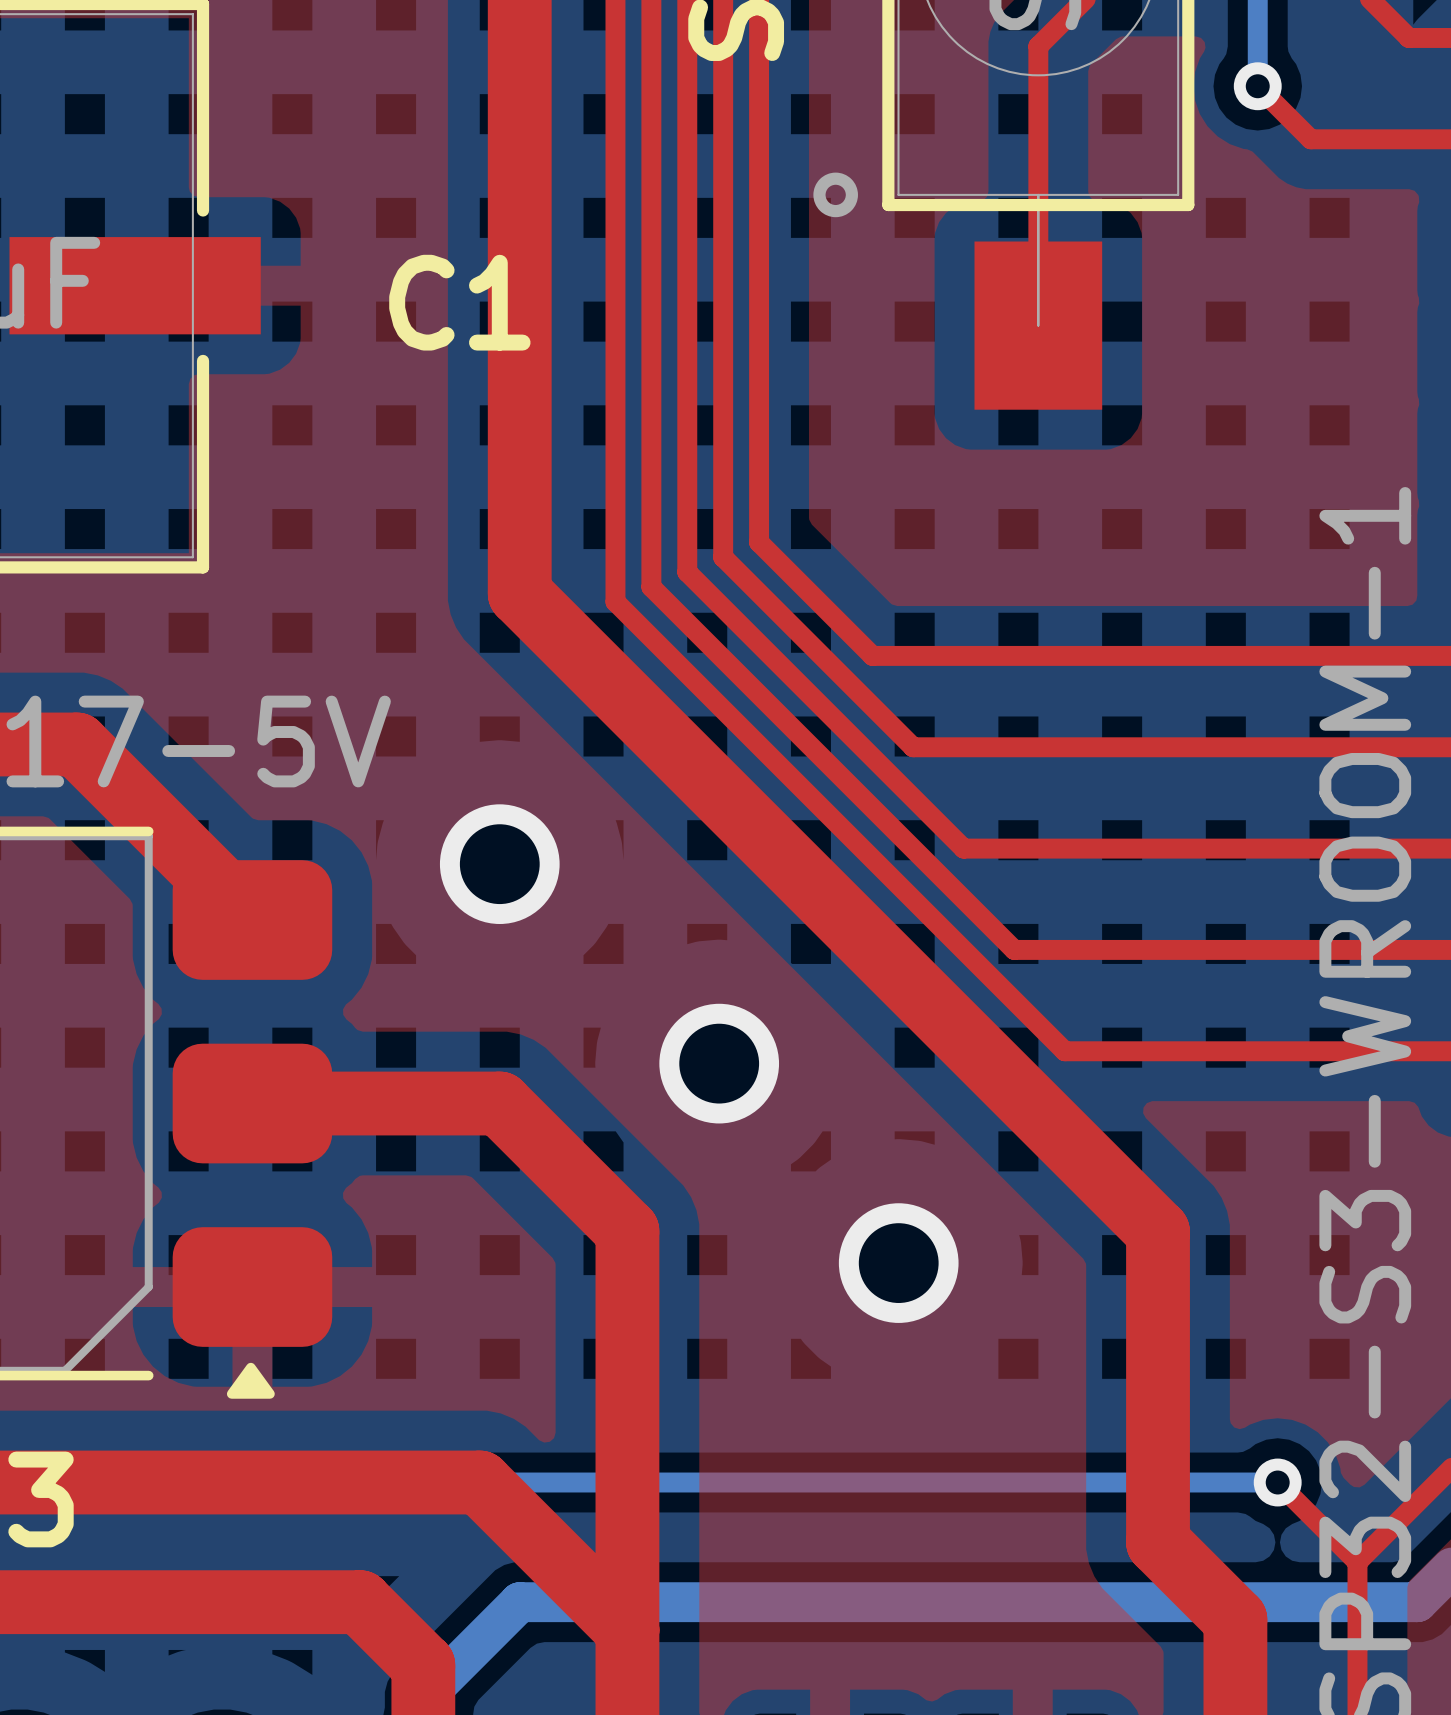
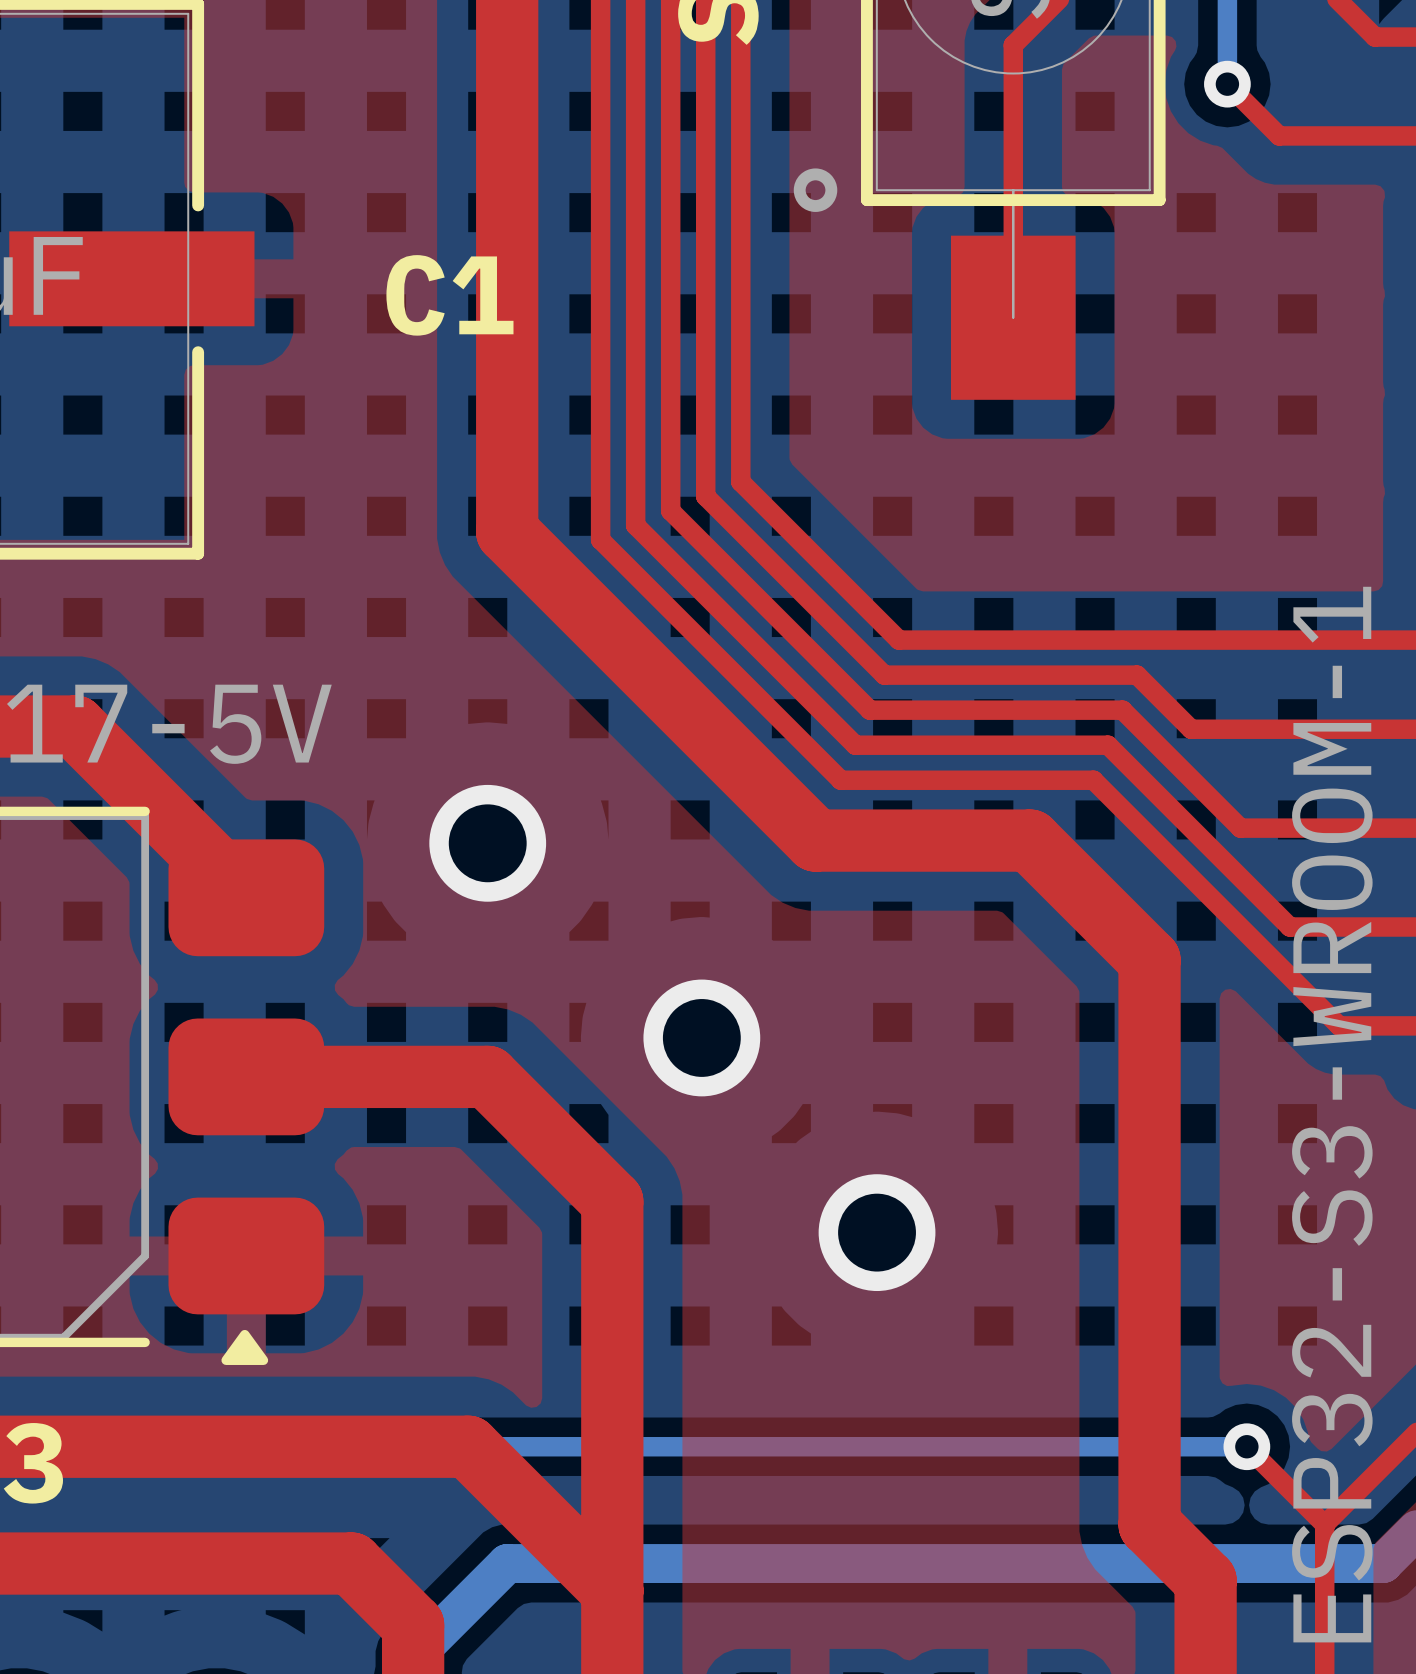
top track: (759, 493) (759, 542) (872, 655) (921, 655) -> (740, 481) (898, 640)
top track: (723, 508) (723, 557) (913, 747) (1220, 747) -> (705, 496) (884, 675) (1137, 675) (1191, 729)
top track: (687, 523) (687, 572) (963, 848) (1271, 848) -> (670, 510) (869, 710) (1122, 710) (1240, 828)
top track: (651, 538) (651, 587) (1014, 949) (1321, 949) -> (635, 525) (855, 745) (1108, 745) (1289, 927)
top track: (519, 545) (519, 593) (1158, 1231) (1158, 1542) (1177, 1562) -> (507, 531) (815, 840) (1030, 840) (1149, 960) (1149, 1524)
top track: (615, 553) (615, 601) (1064, 1051) (1372, 1051) -> (600, 539) (840, 780) (1093, 780) (1339, 1025)

